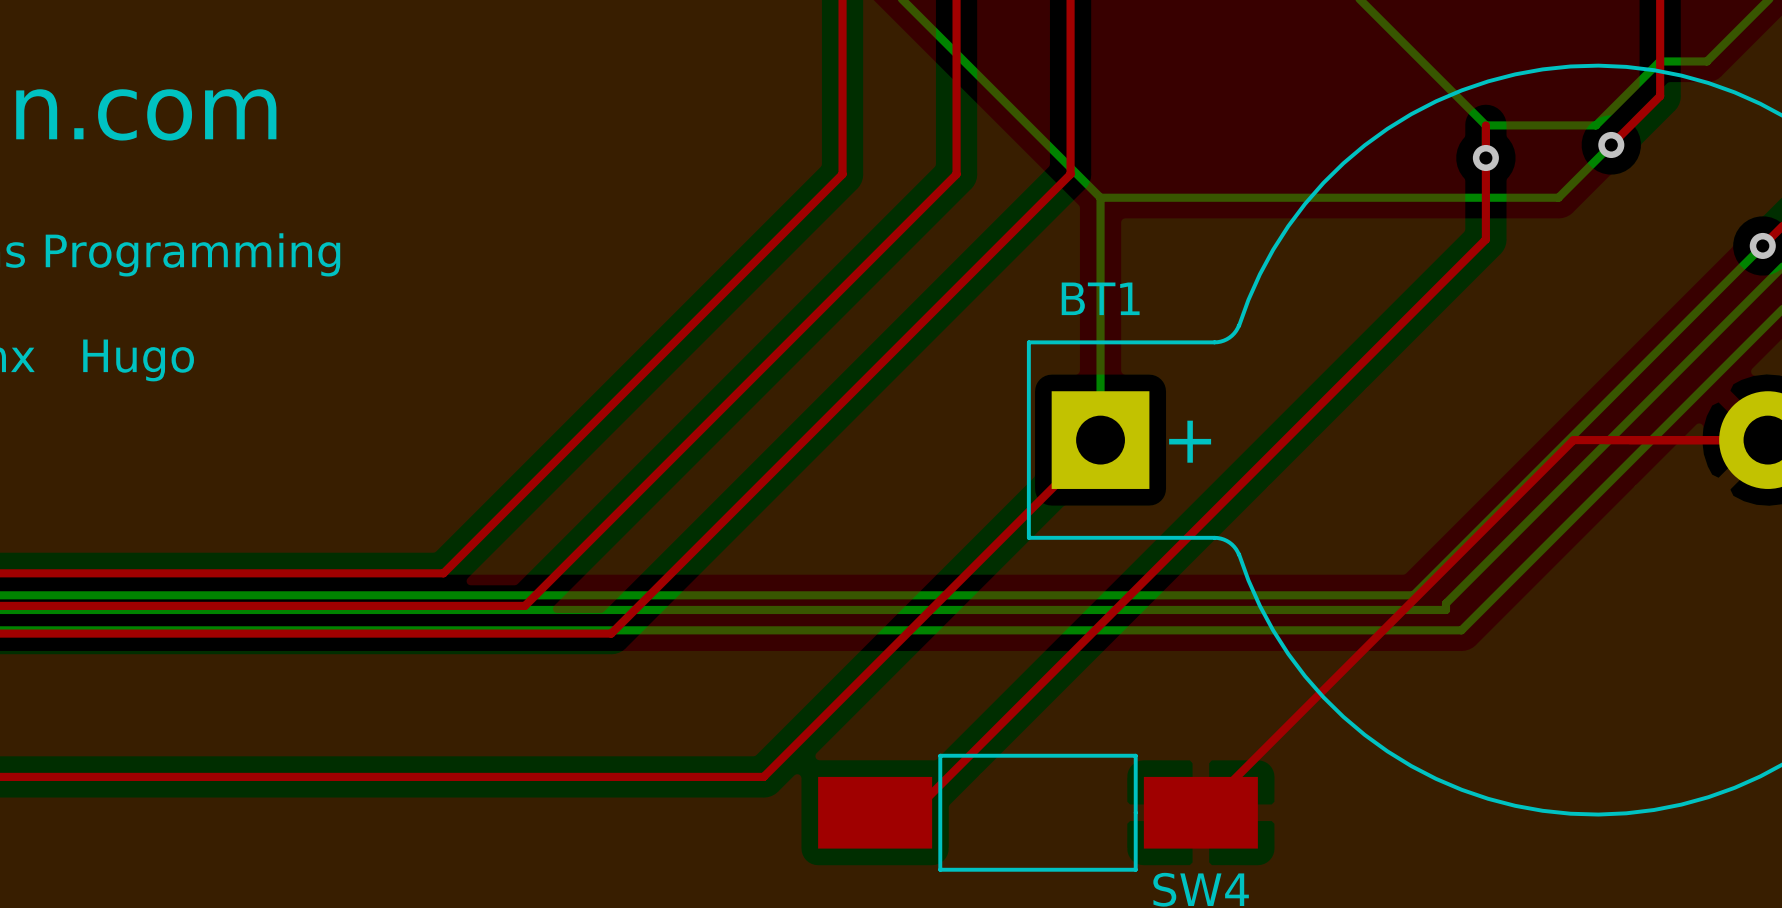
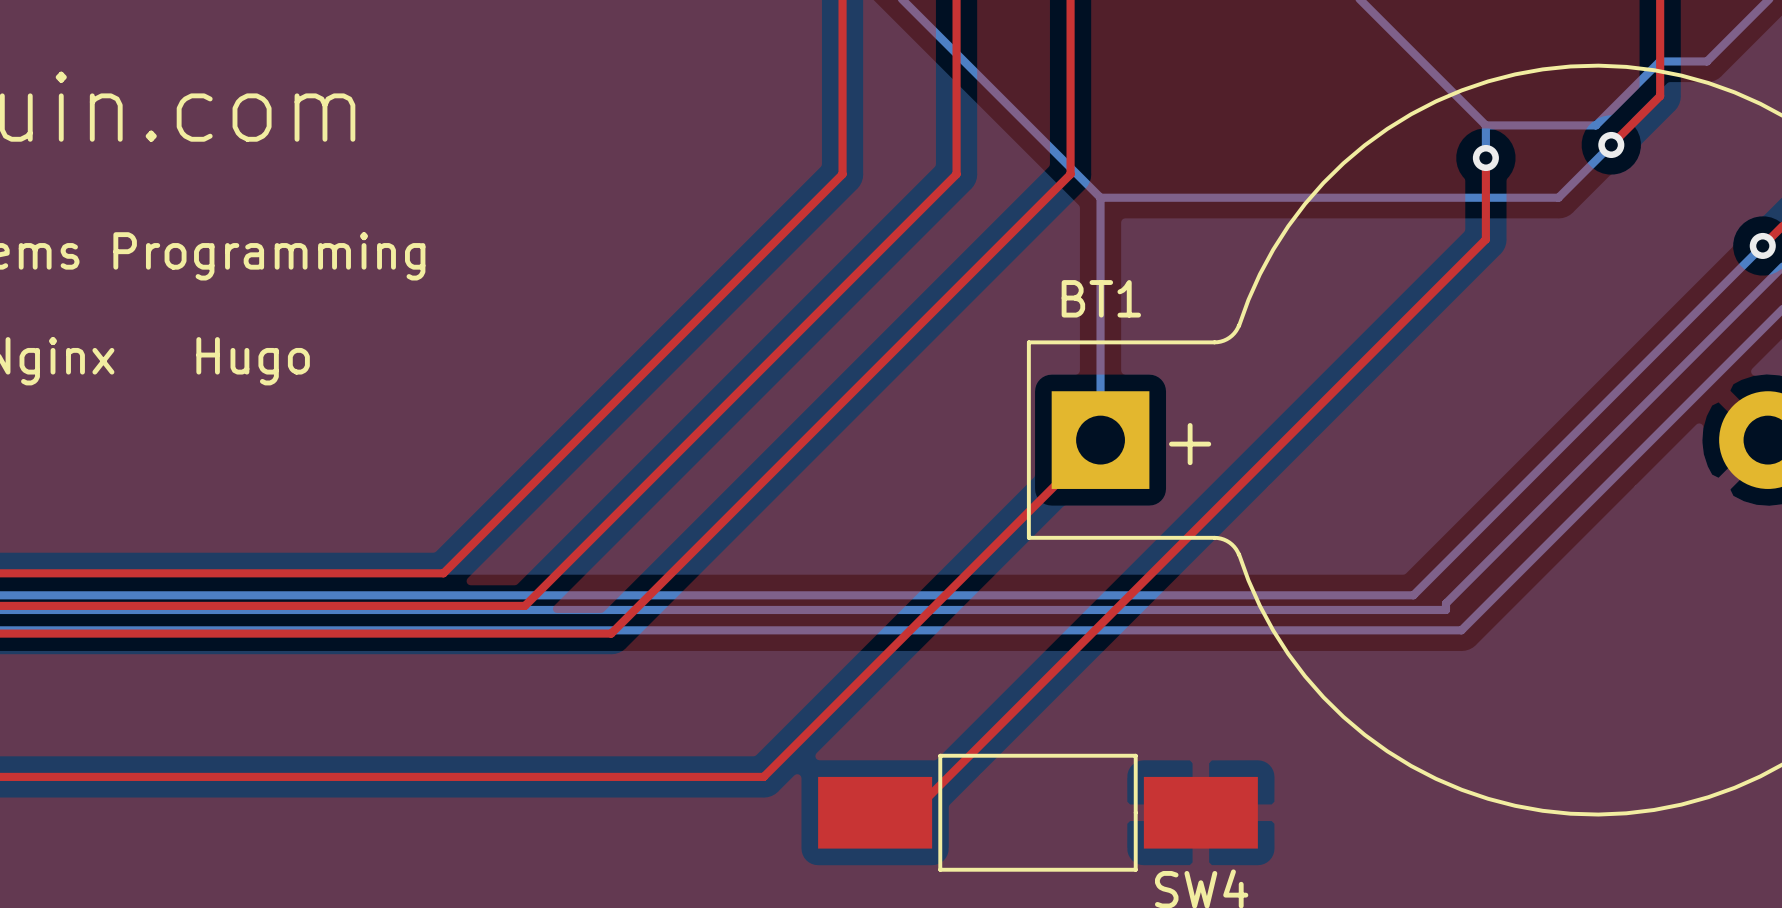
top track: (1485, 125) (1485, 158) -> none
top track: (1767, 440) (1573, 440) (1200, 812) -> none

